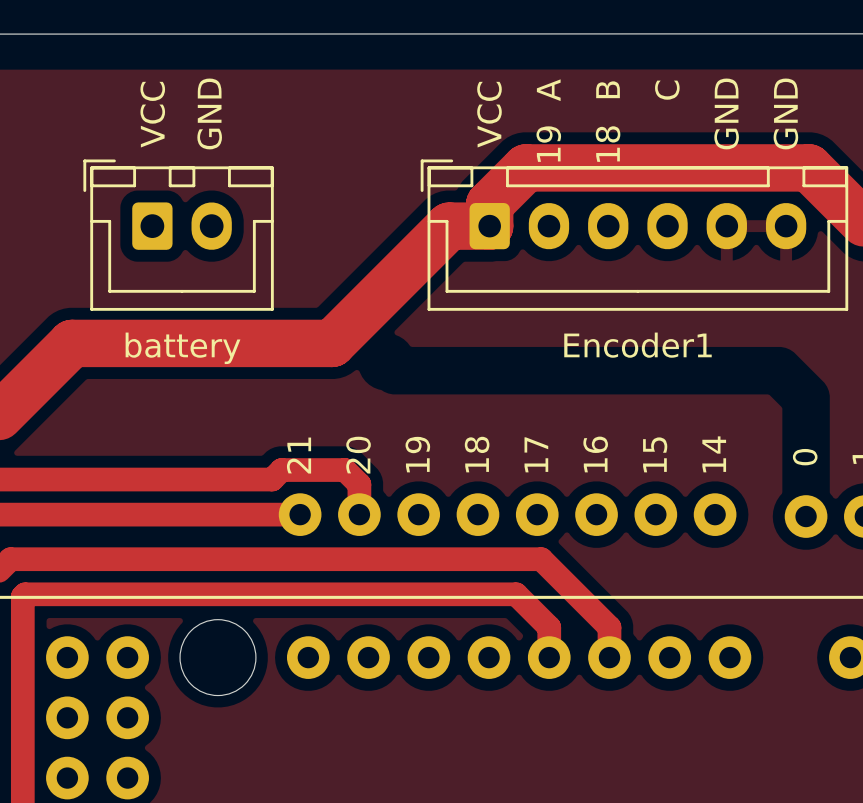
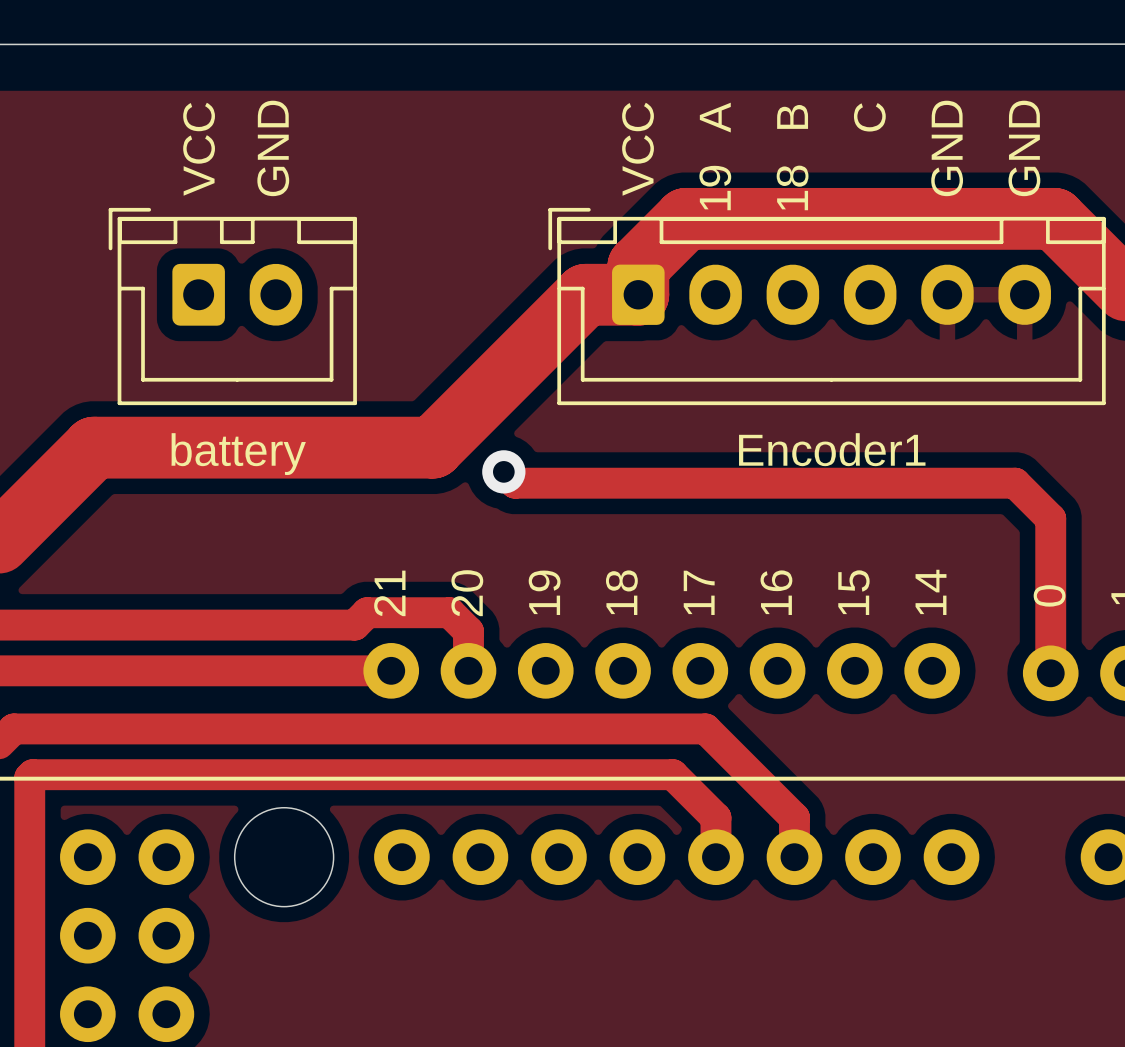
track: none -> (503, 471) (515, 483) (1015, 483) (1050, 518) (1050, 673)
via: none -> (503, 471)

